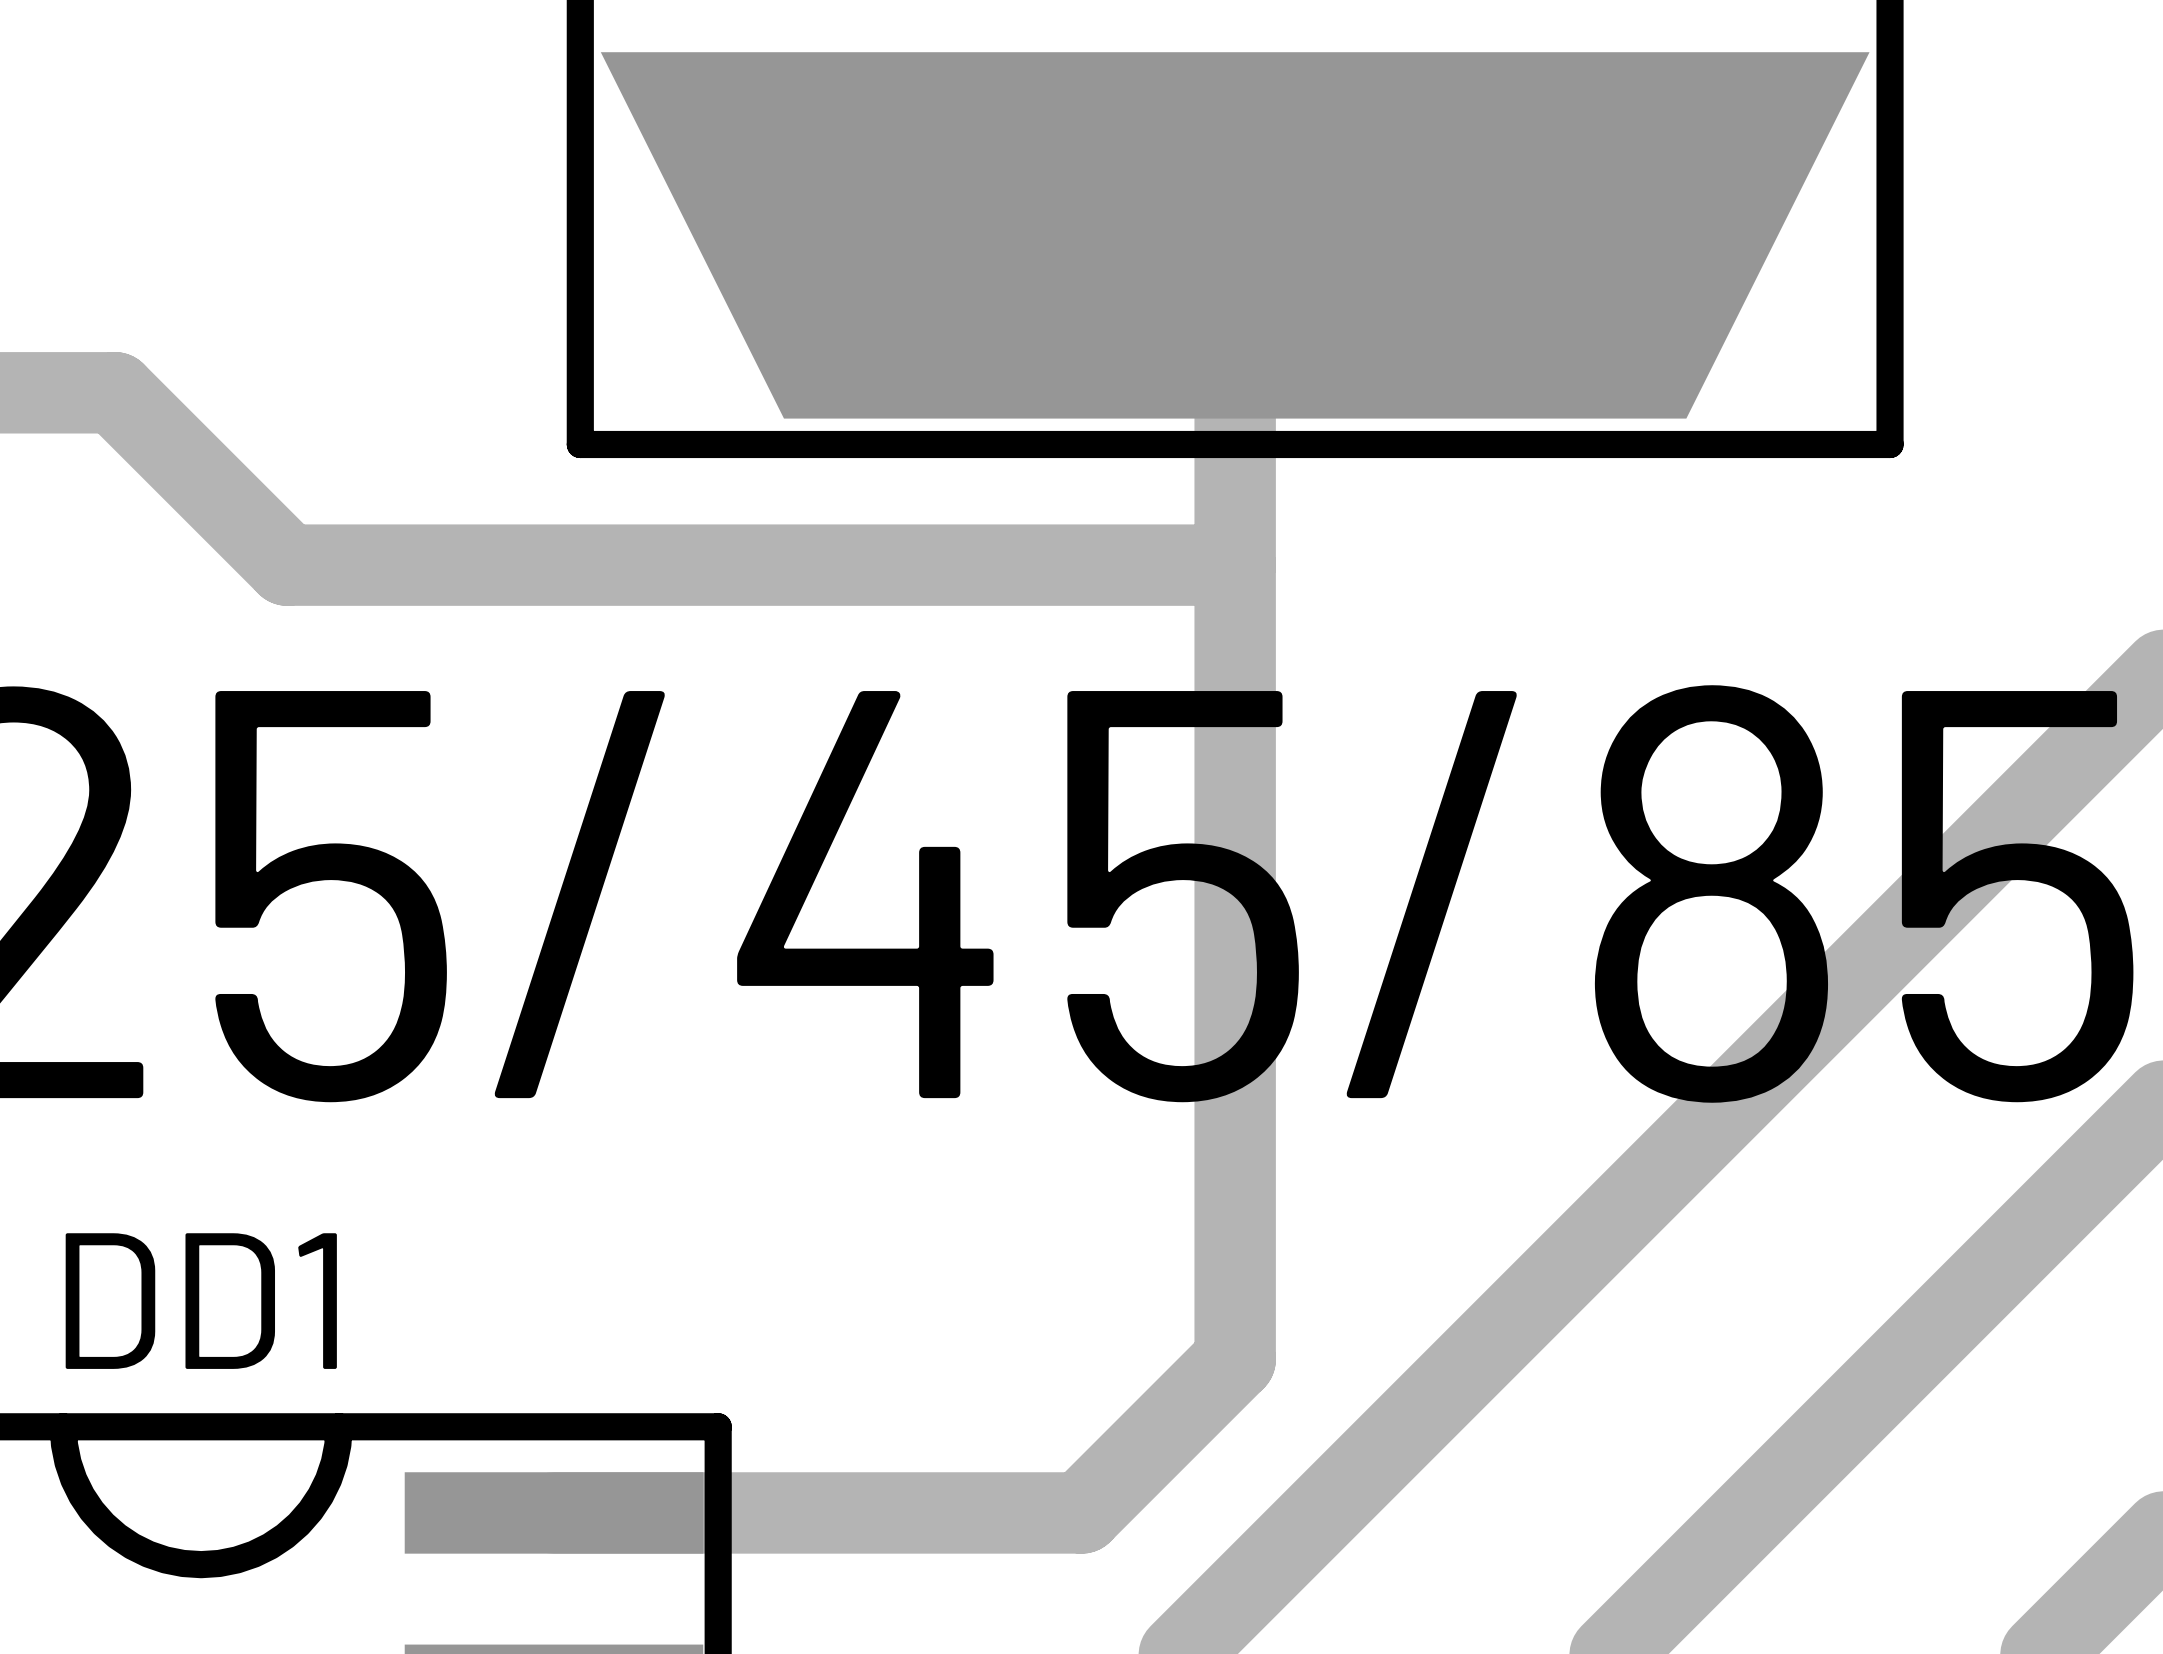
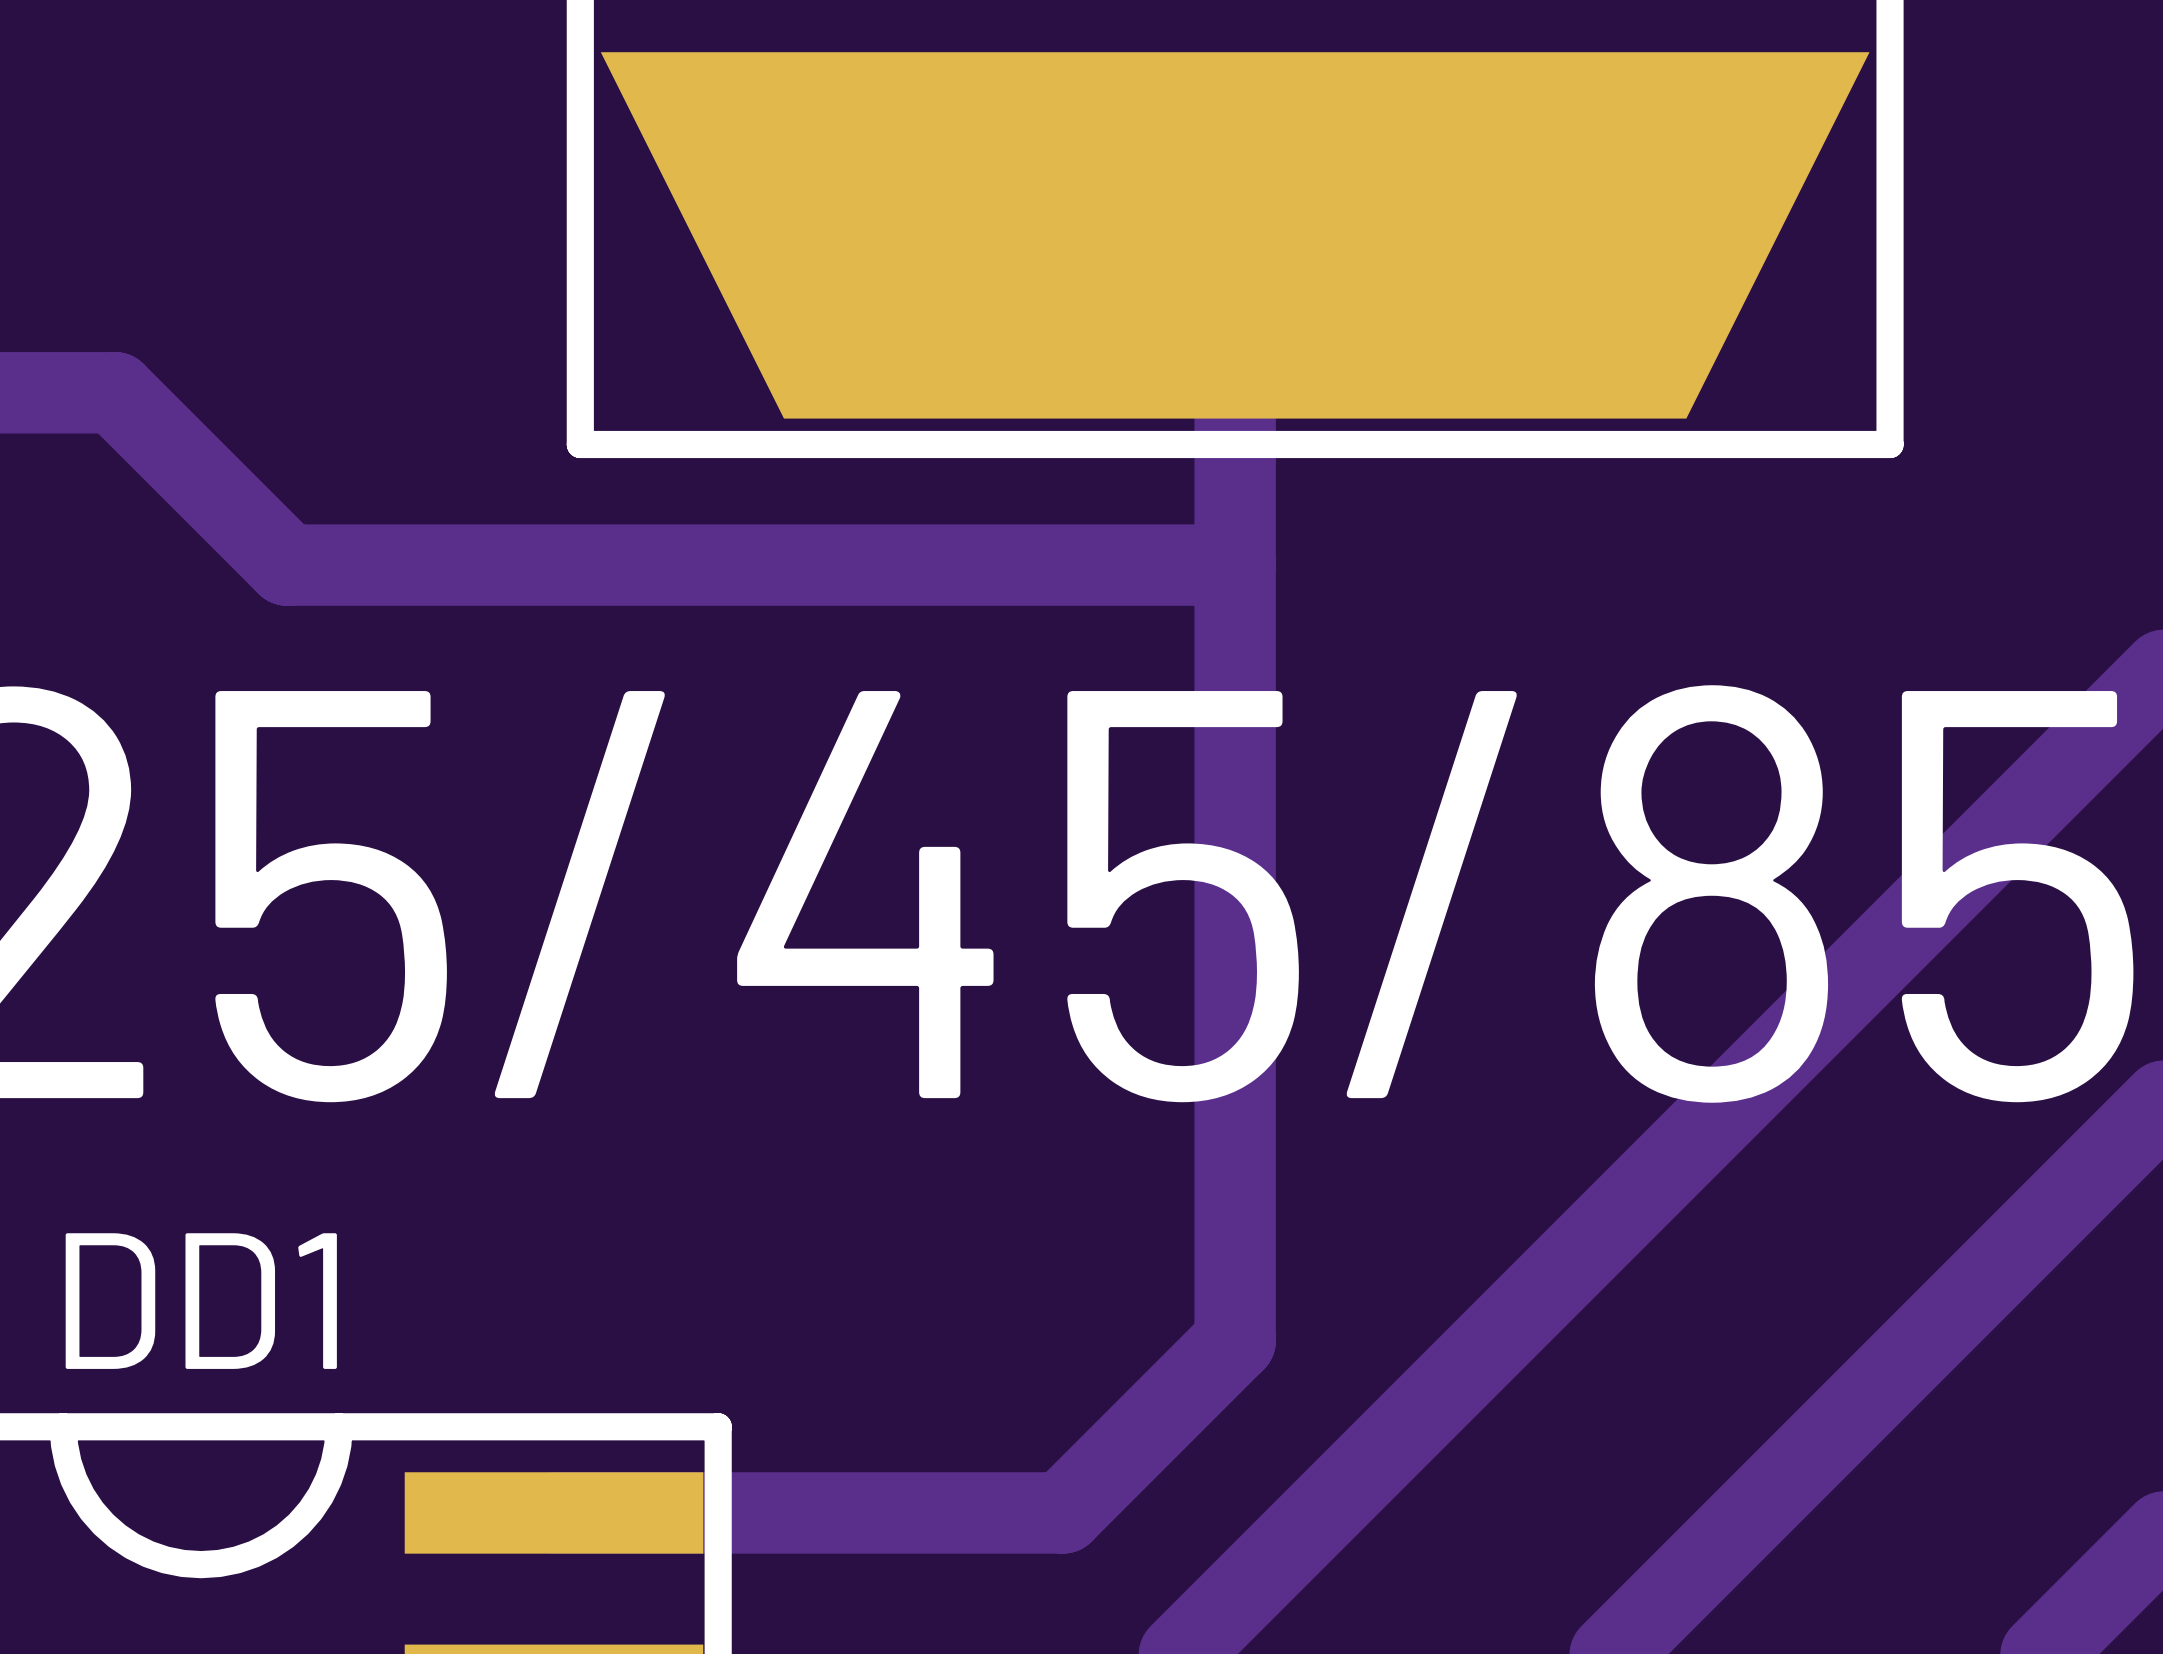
track: (1235, 1340) (1235, 1359) (1081, 1512) (1062, 1512) -> (1235, 1340) (1062, 1512)

